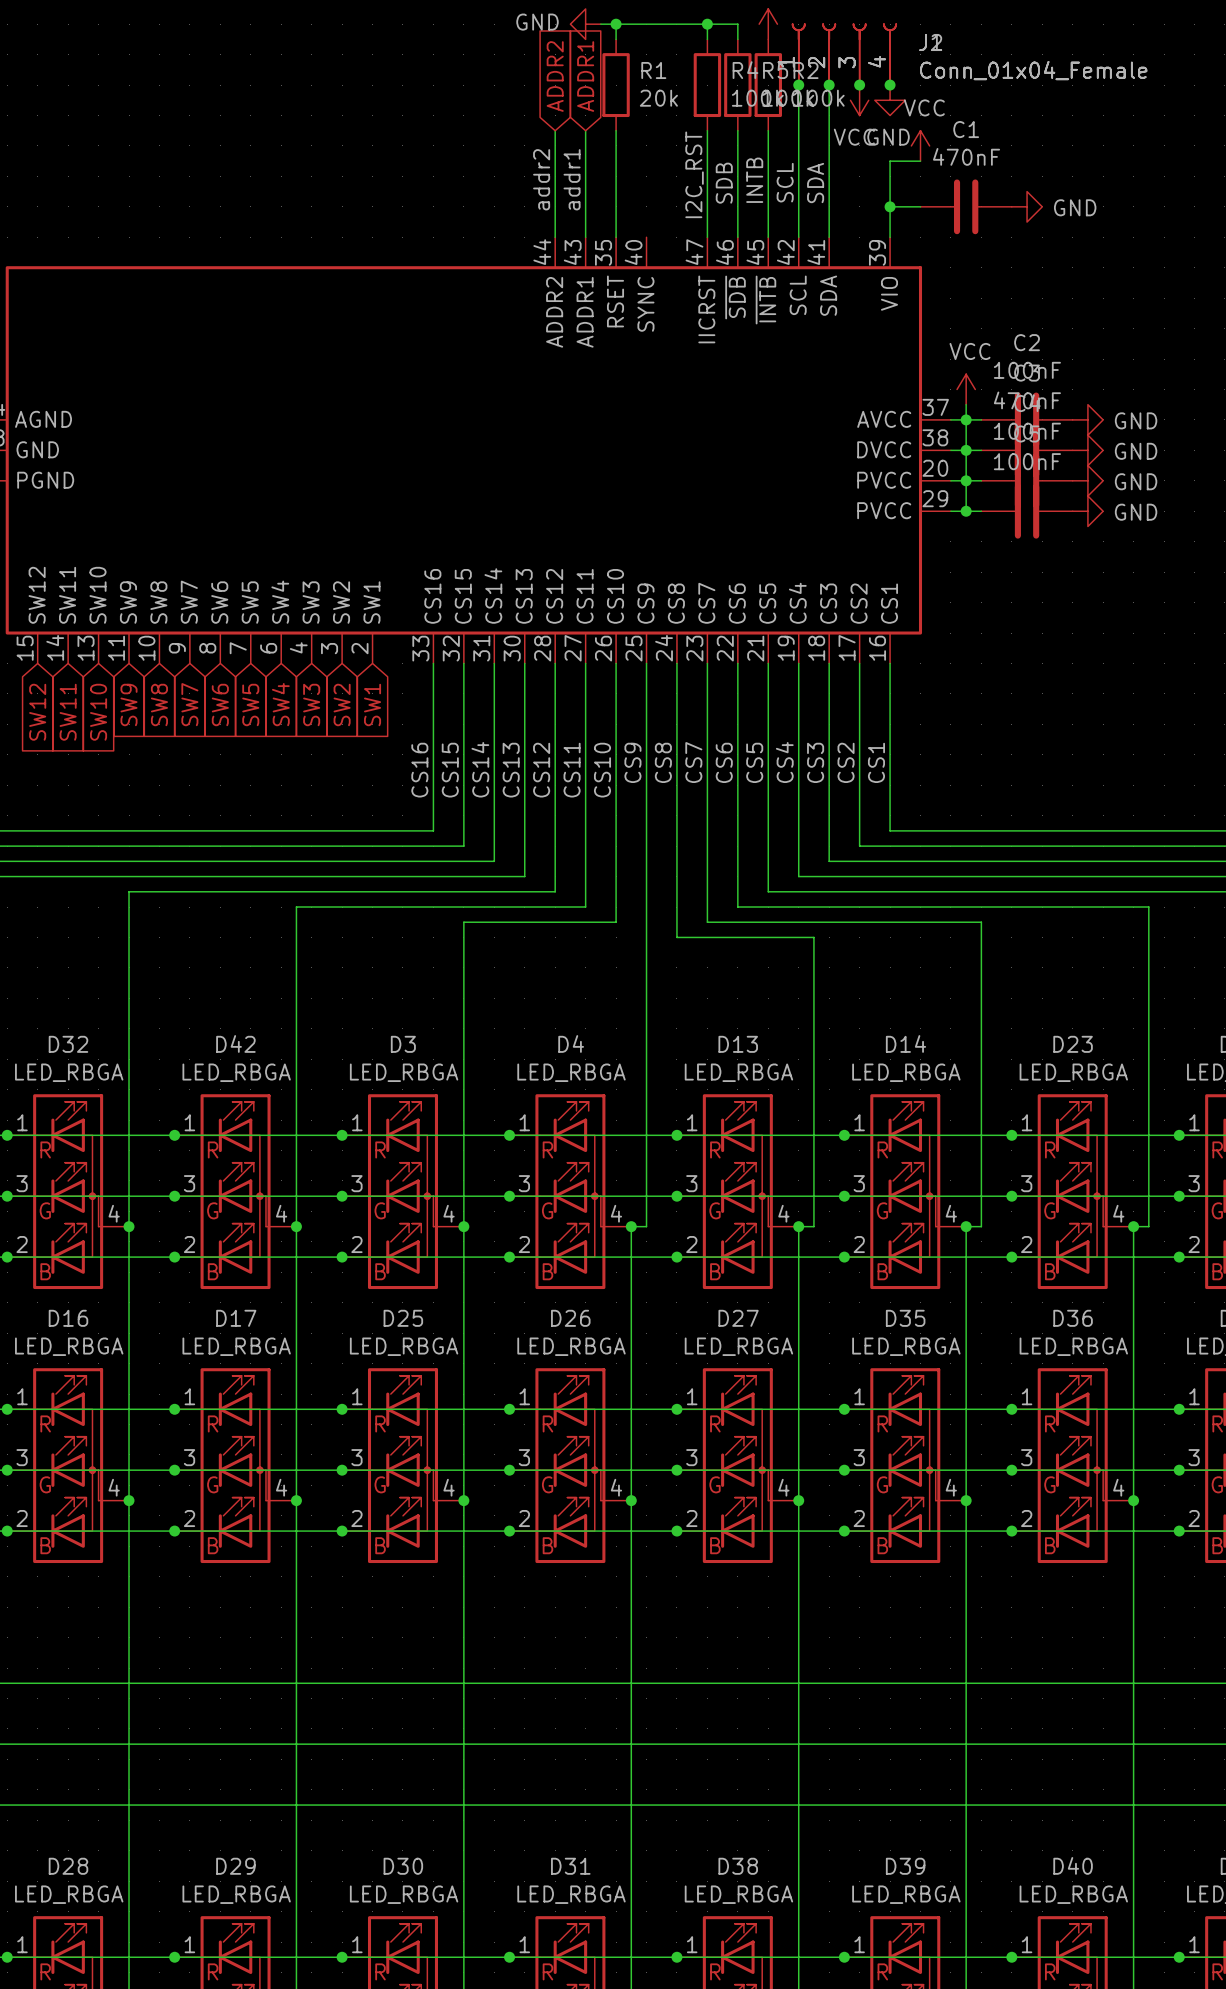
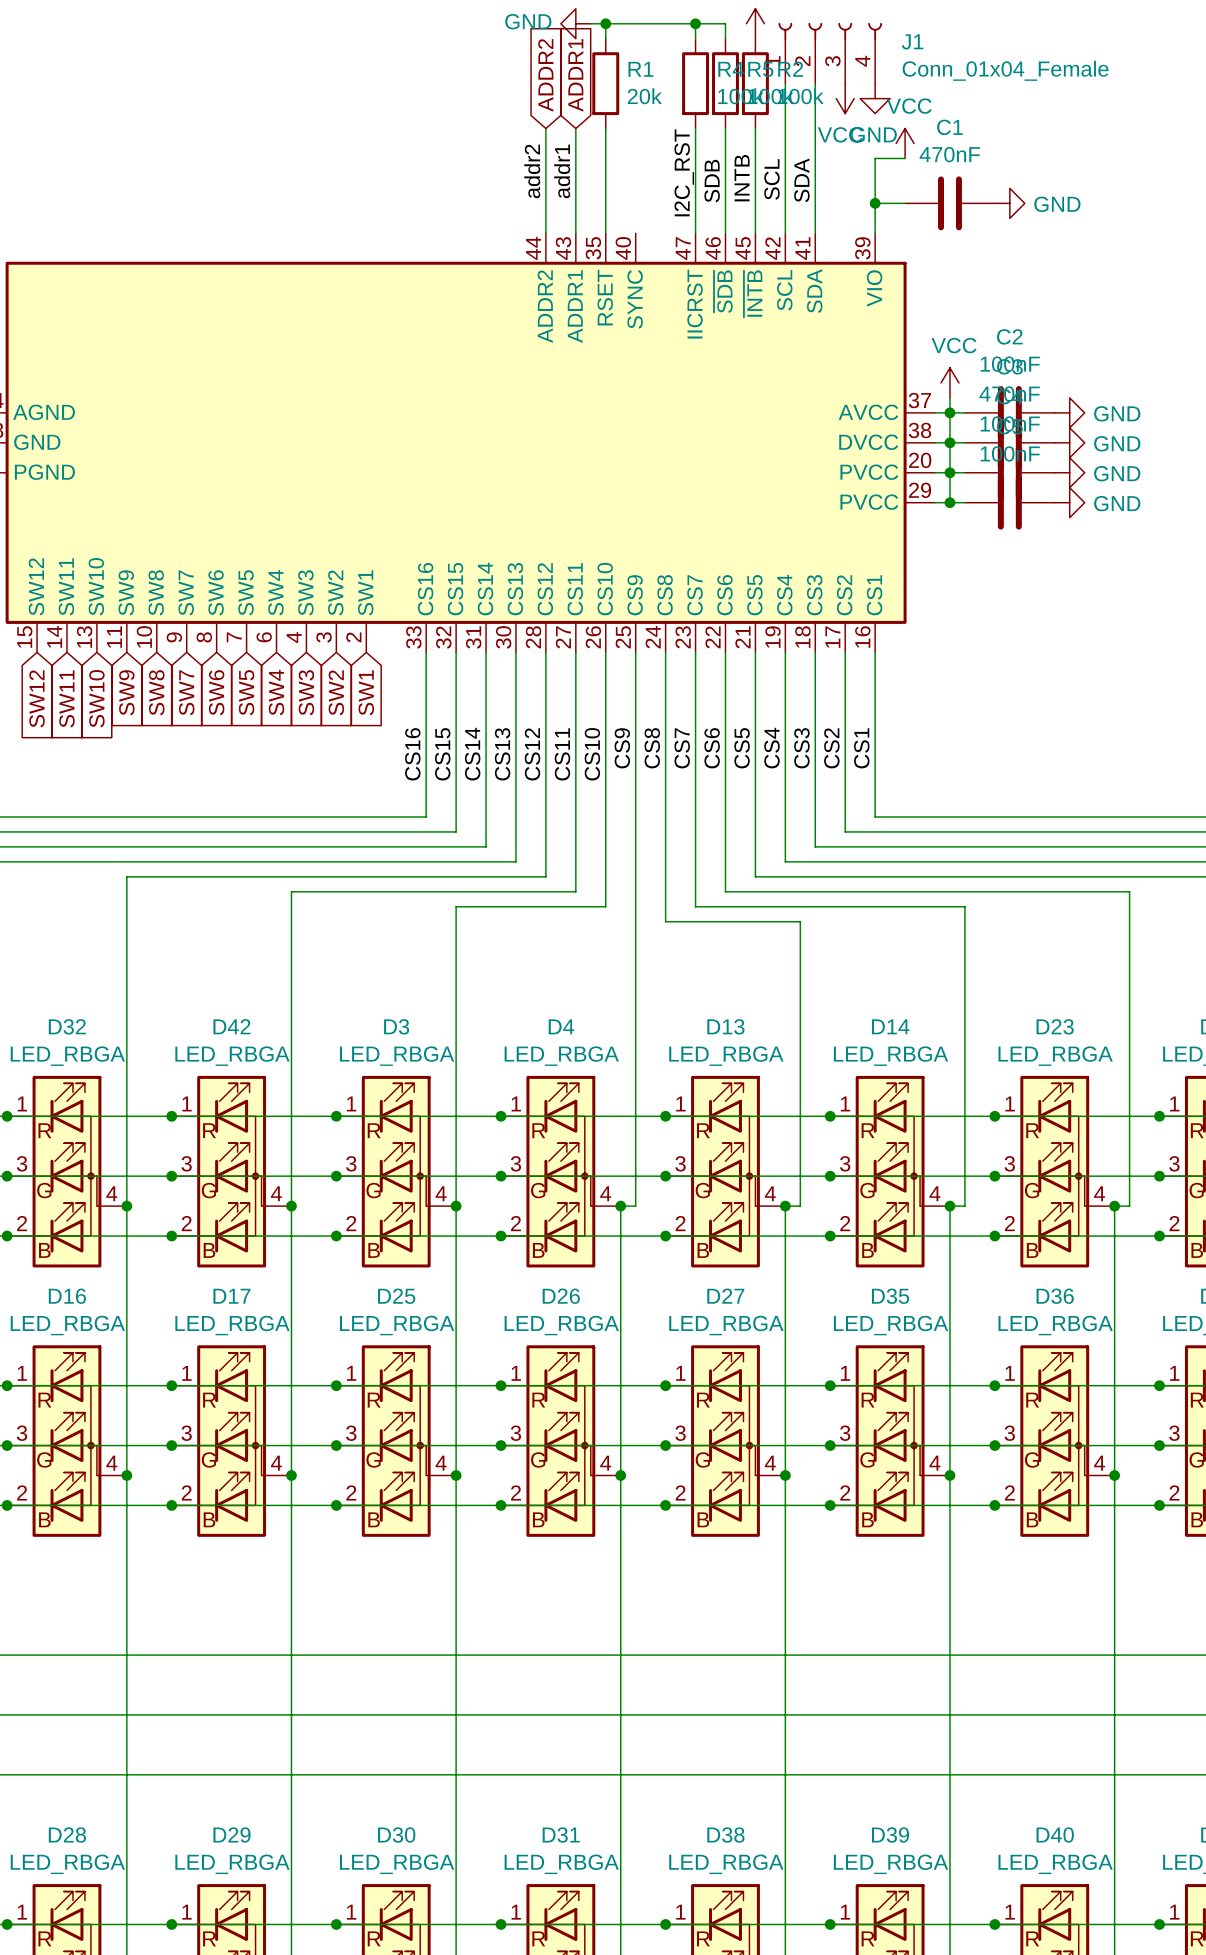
part: Conn_01x04_Female (844, 54) -> none
junction: (798, 85) -> none
junction: (829, 85) -> none
junction: (859, 85) -> none
junction: (890, 85) -> none

